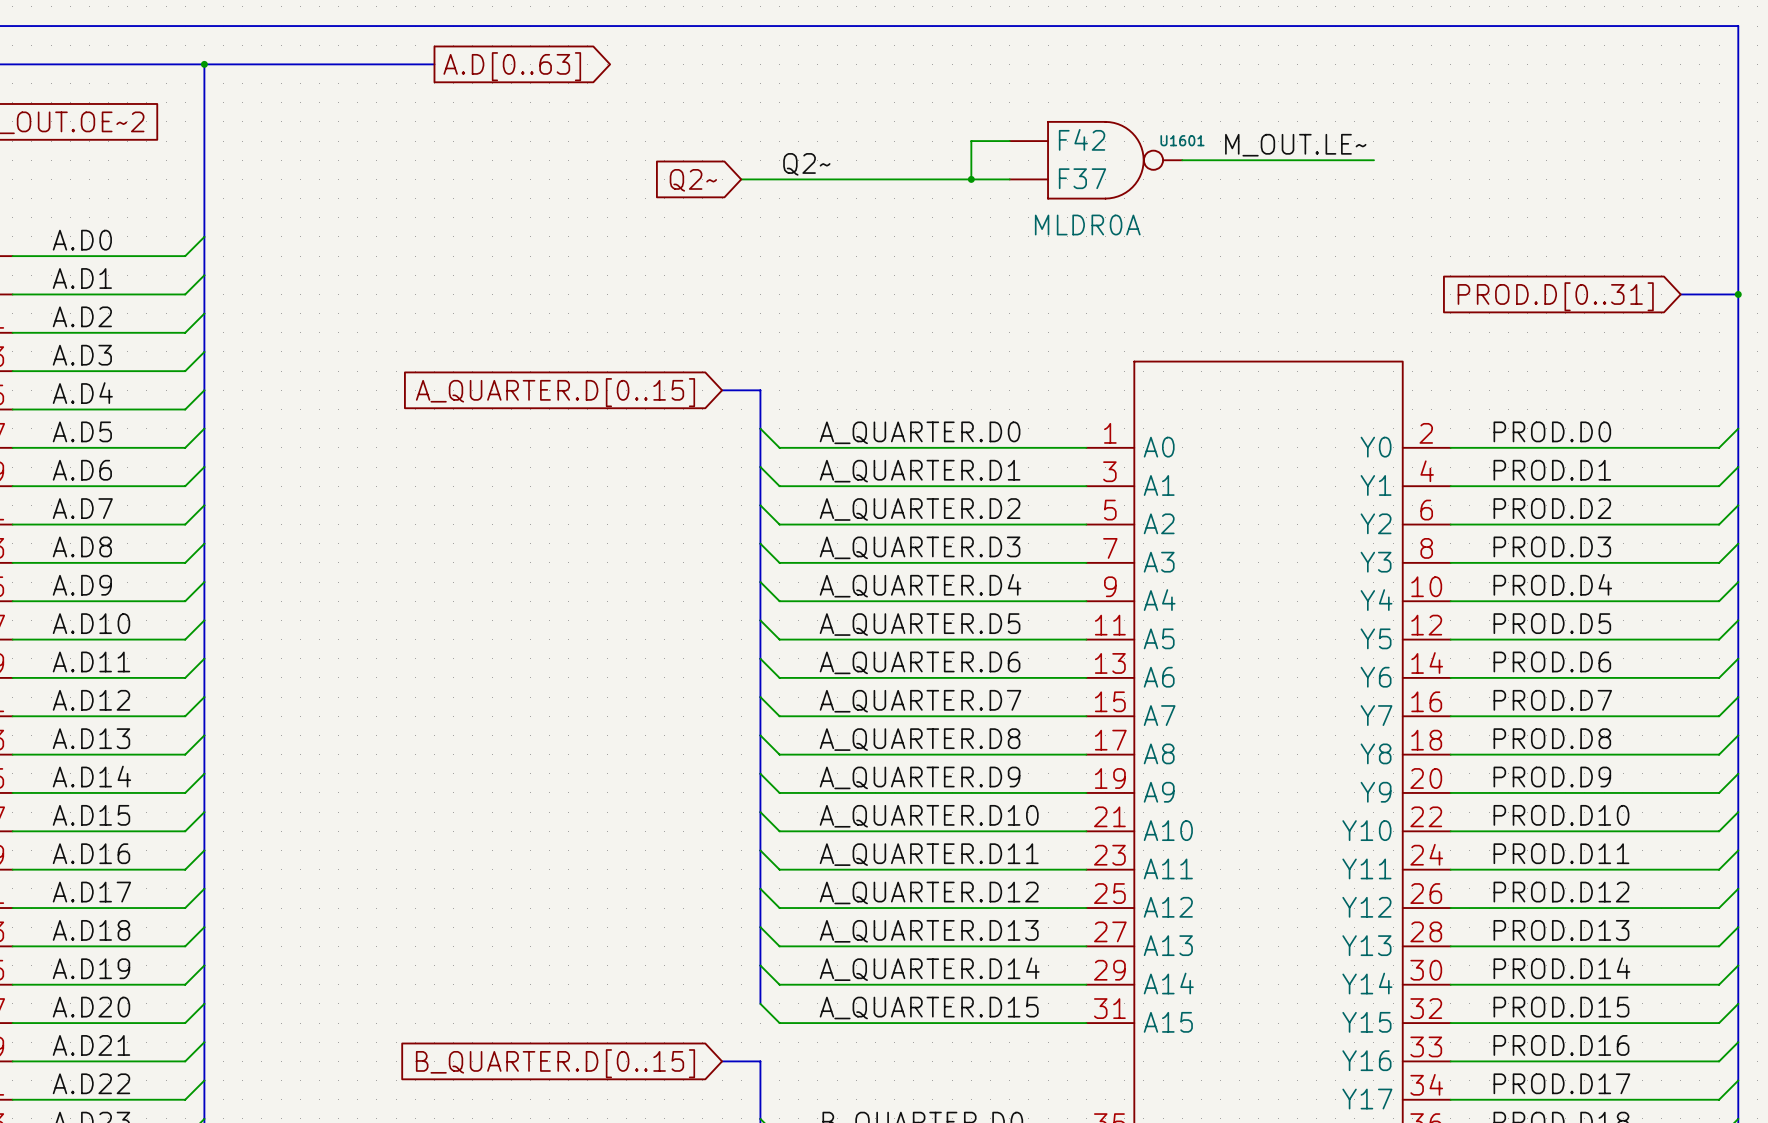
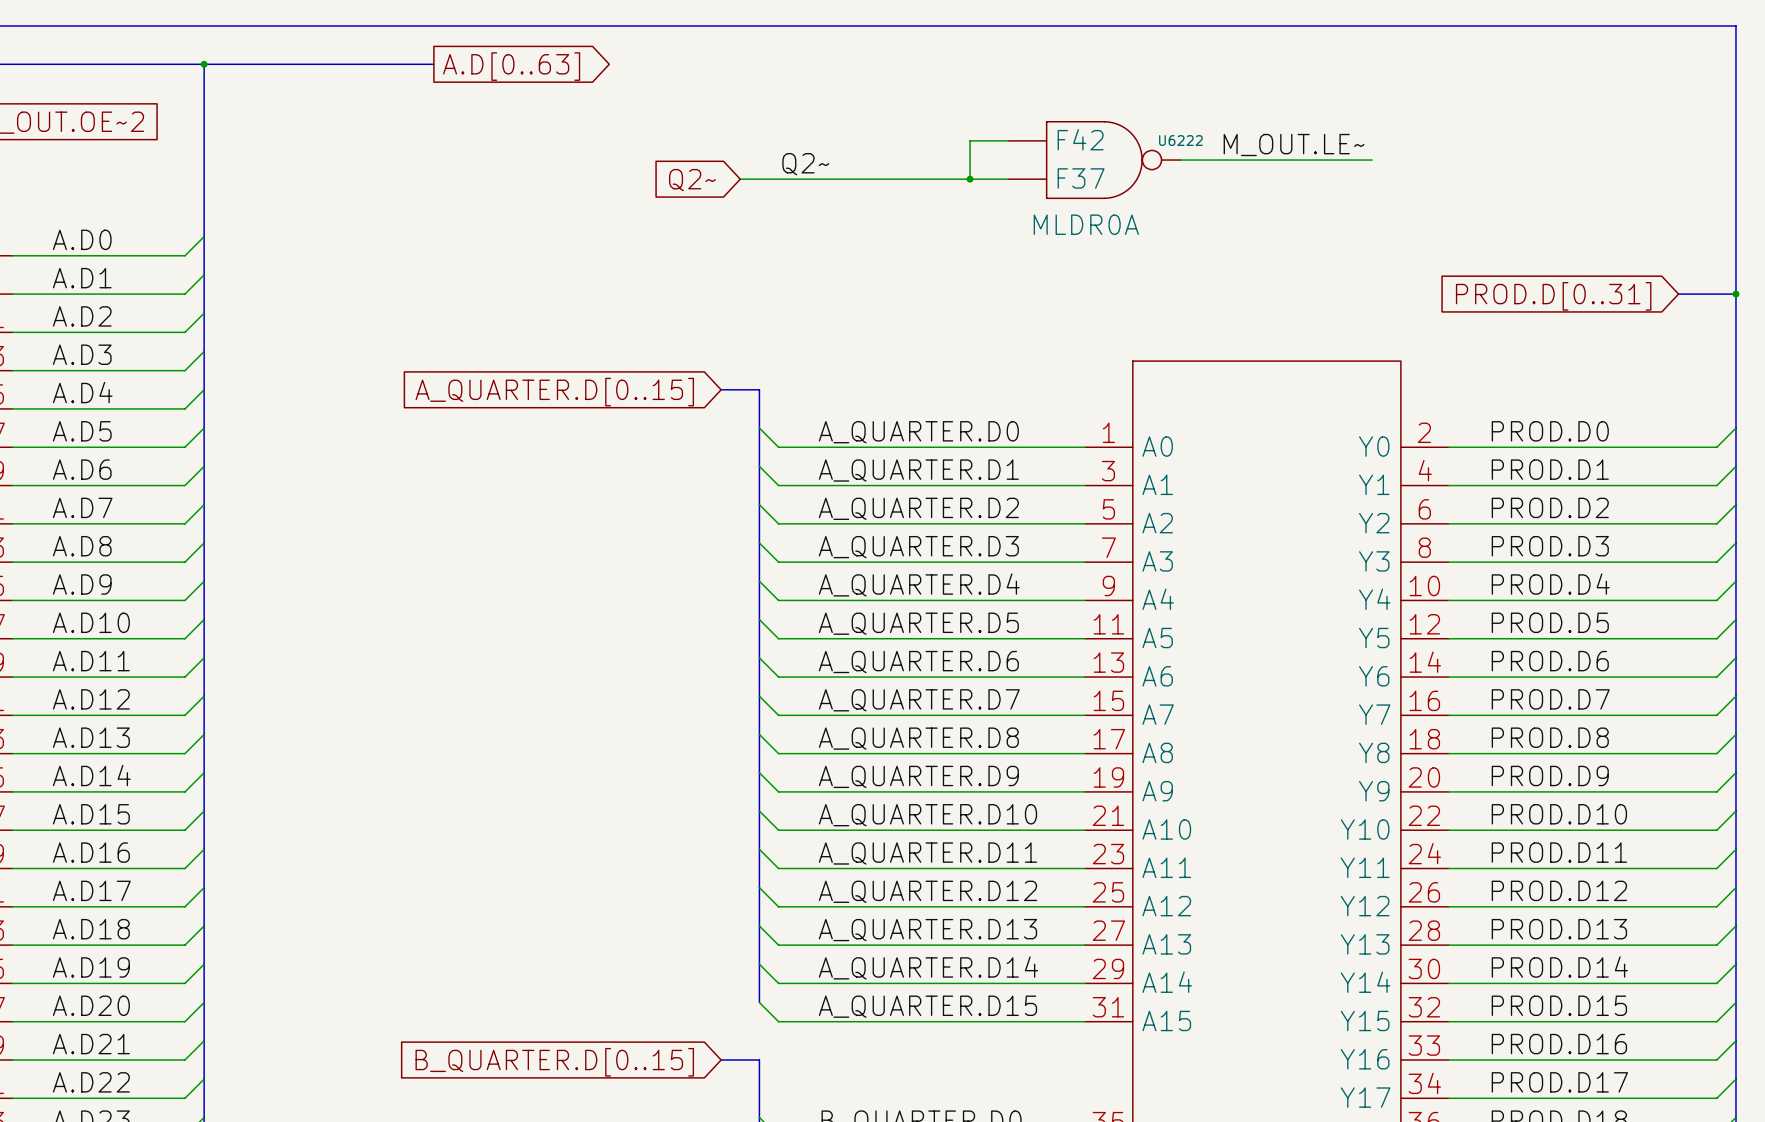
U1601 name: U1601 (1182, 140) -> U6222 (1180, 140)

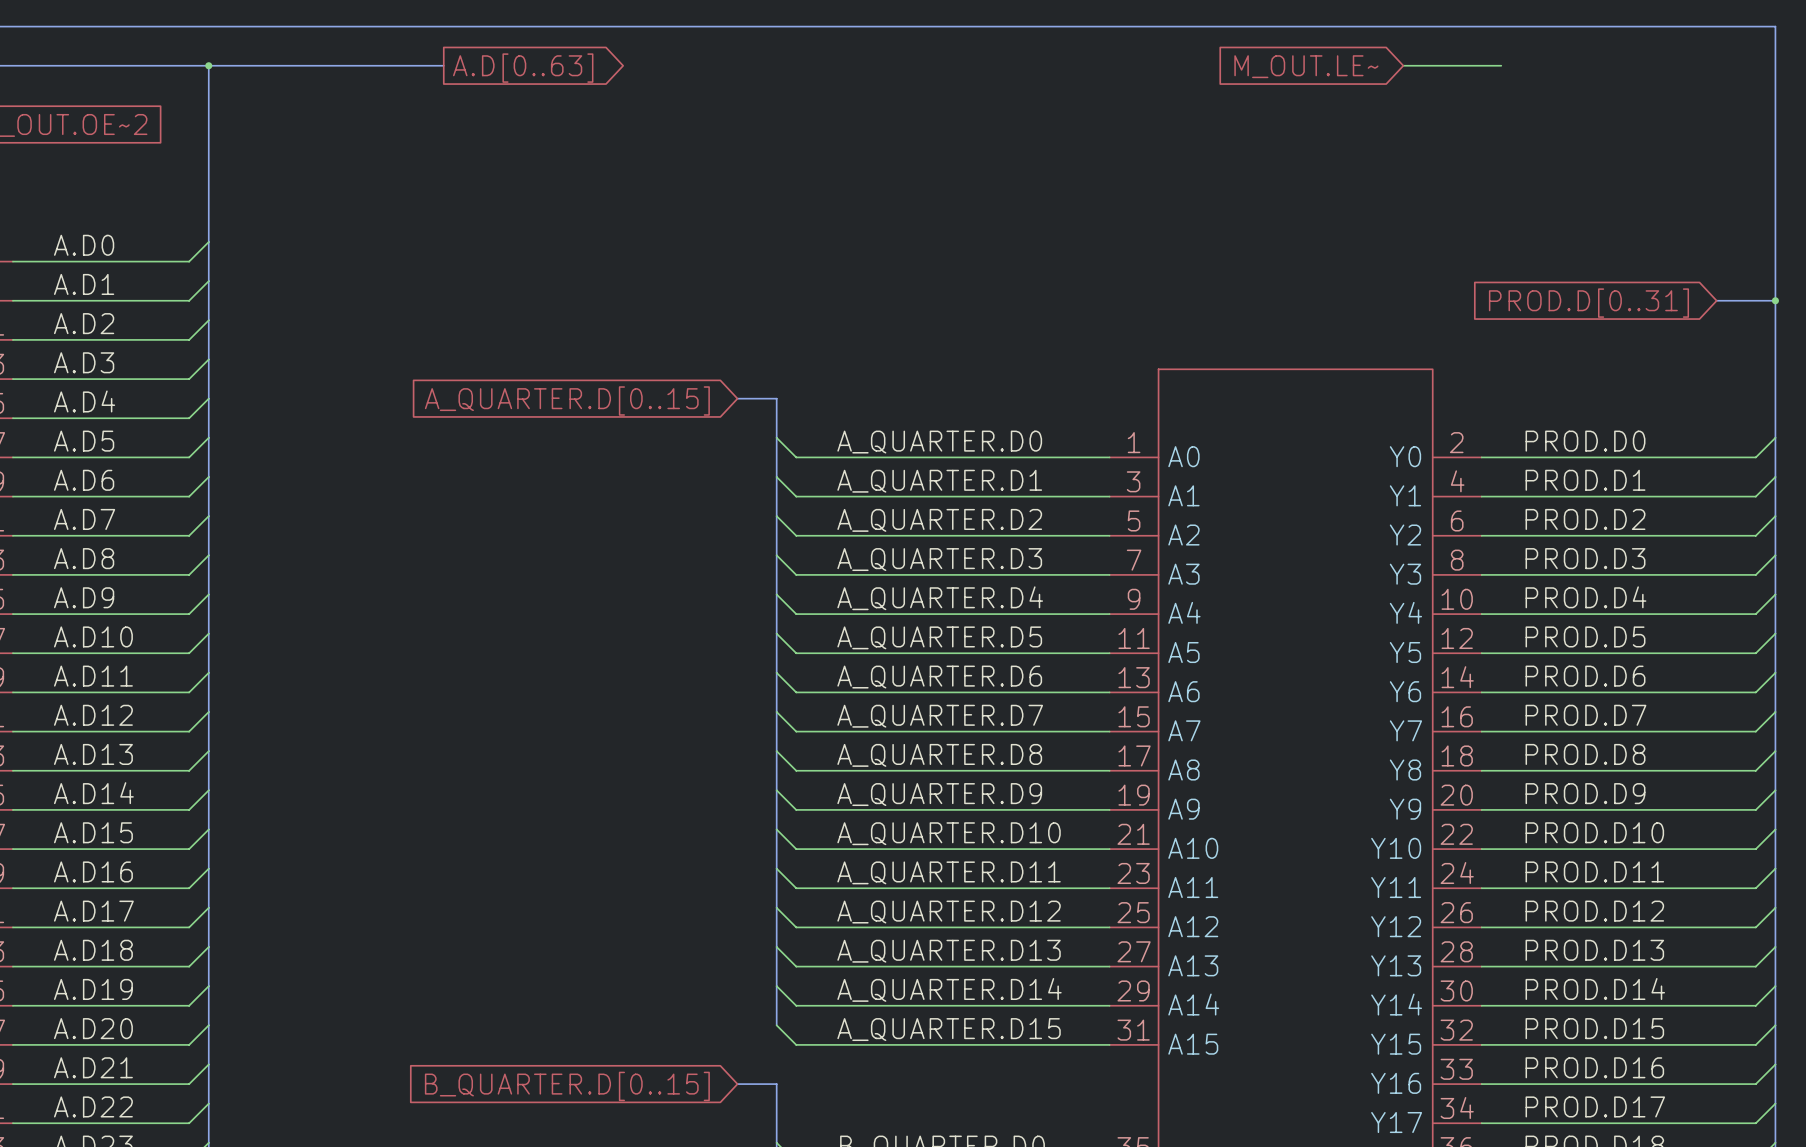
wire: none -> (1403, 65) (1501, 65)
global label: none -> M_OUT.LE~ (1306, 66)
wire: (1008, 140) (970, 140) (970, 179) -> none
label: M_OUT.LE~ (1294, 145) -> none
U6222: F37 (1094, 160) -> none
wire: (1180, 160) (1372, 160) -> none
label: Q2~ (805, 164) -> none
wire: (740, 179) (1008, 179) -> none
junction: (970, 179) -> none
global label: Q2~ (692, 180) -> none

